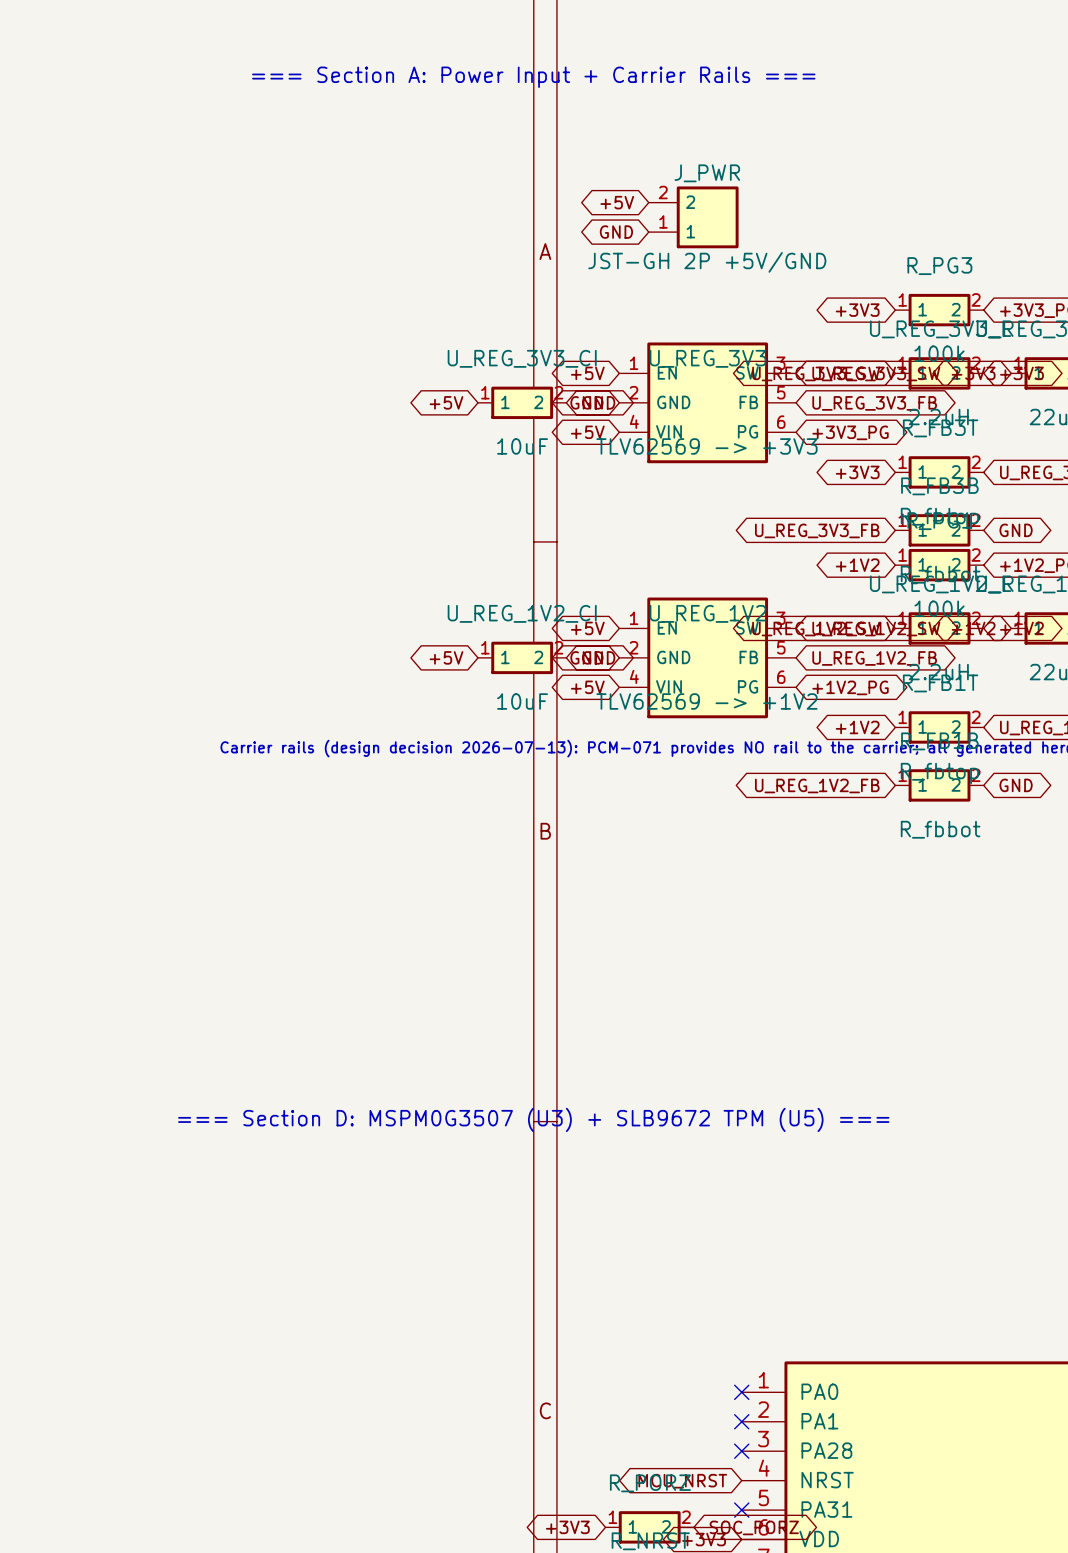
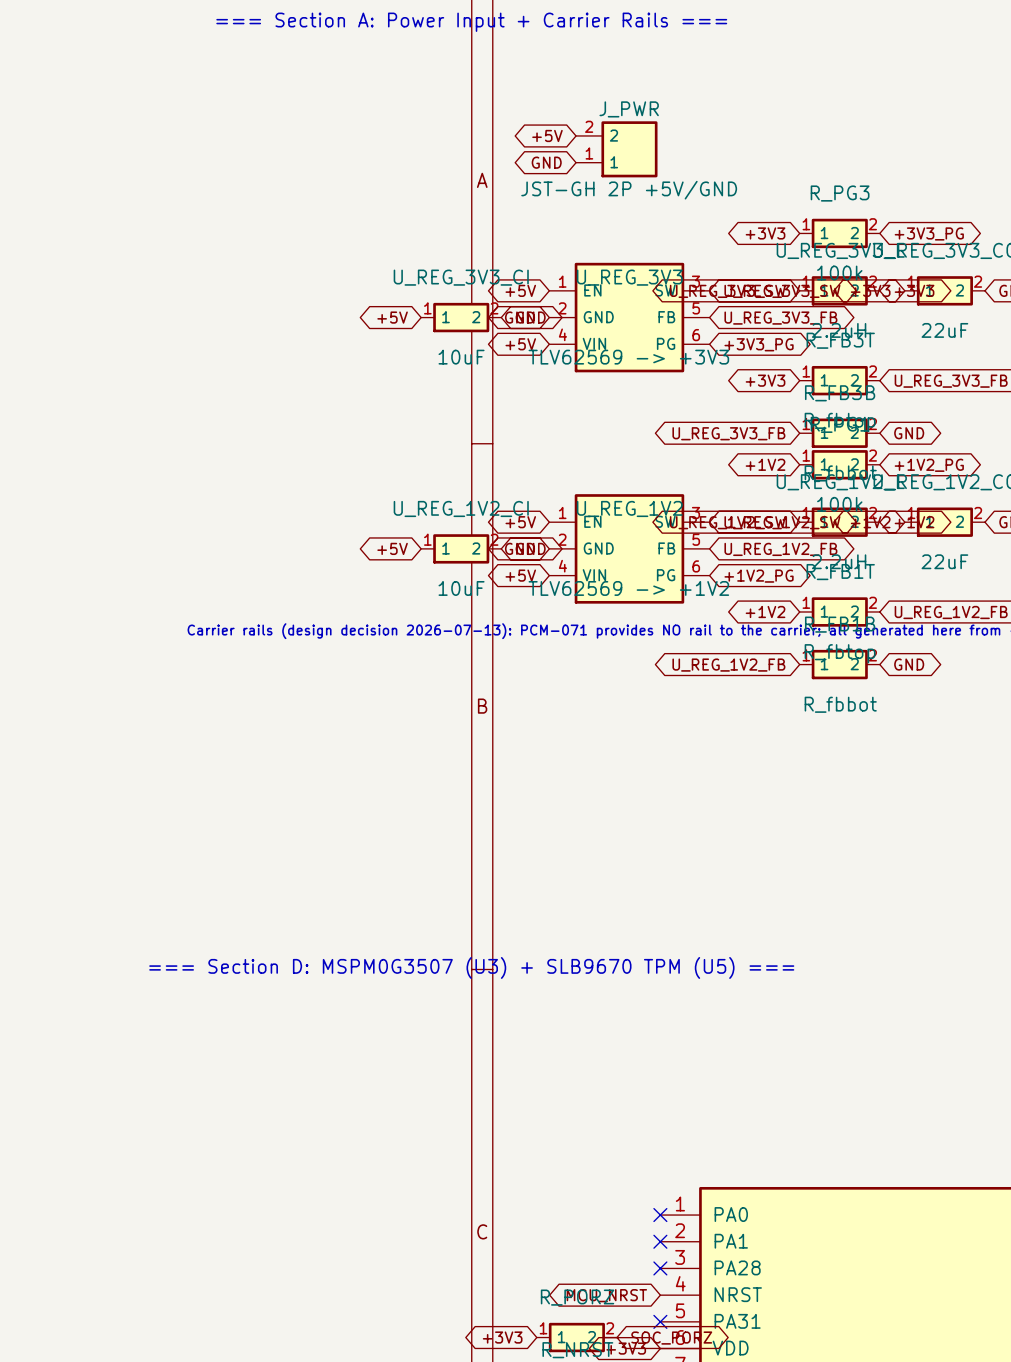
text: === Section D: MSPM0G3507 (U3) + SLB9672 TPM (U5) === (533, 1119) -> === Section D: MSPM0G3507 (U3) + SLB9670 TPM (U5) === (471, 967)

